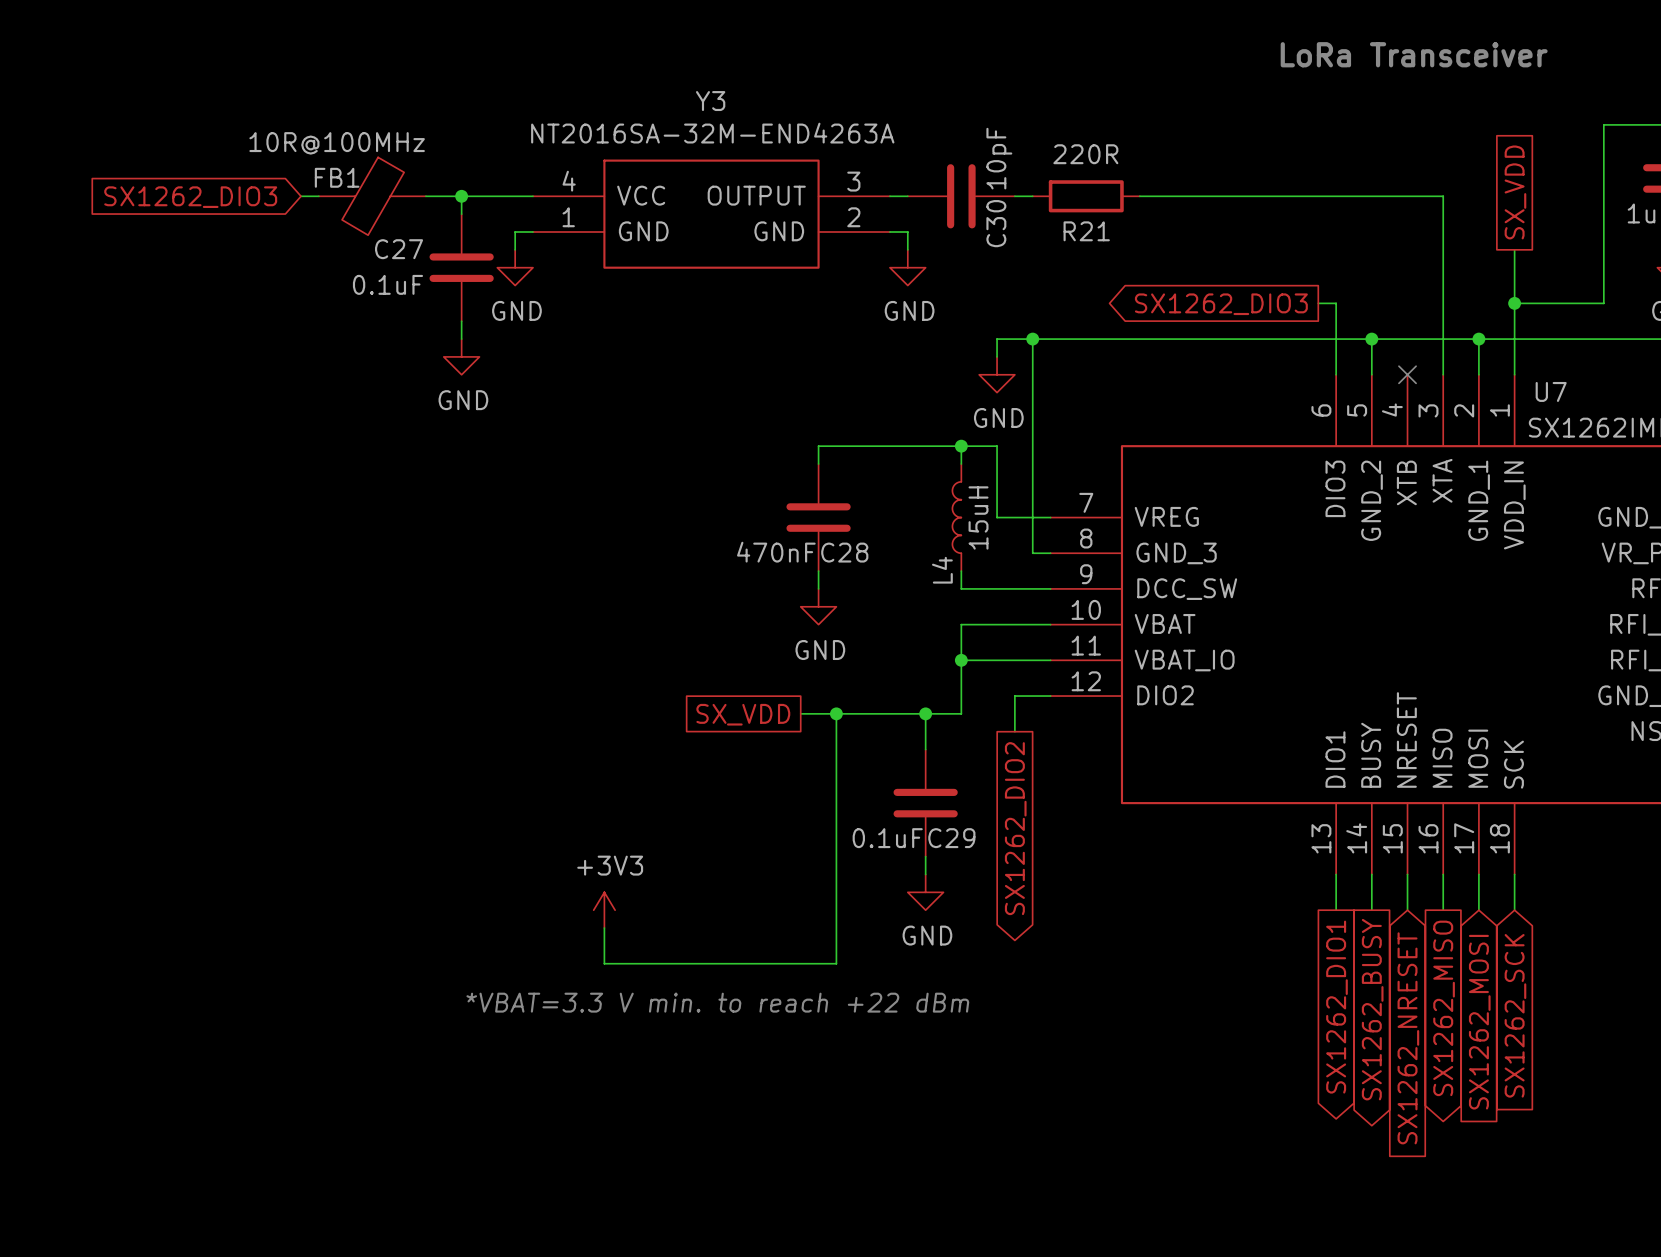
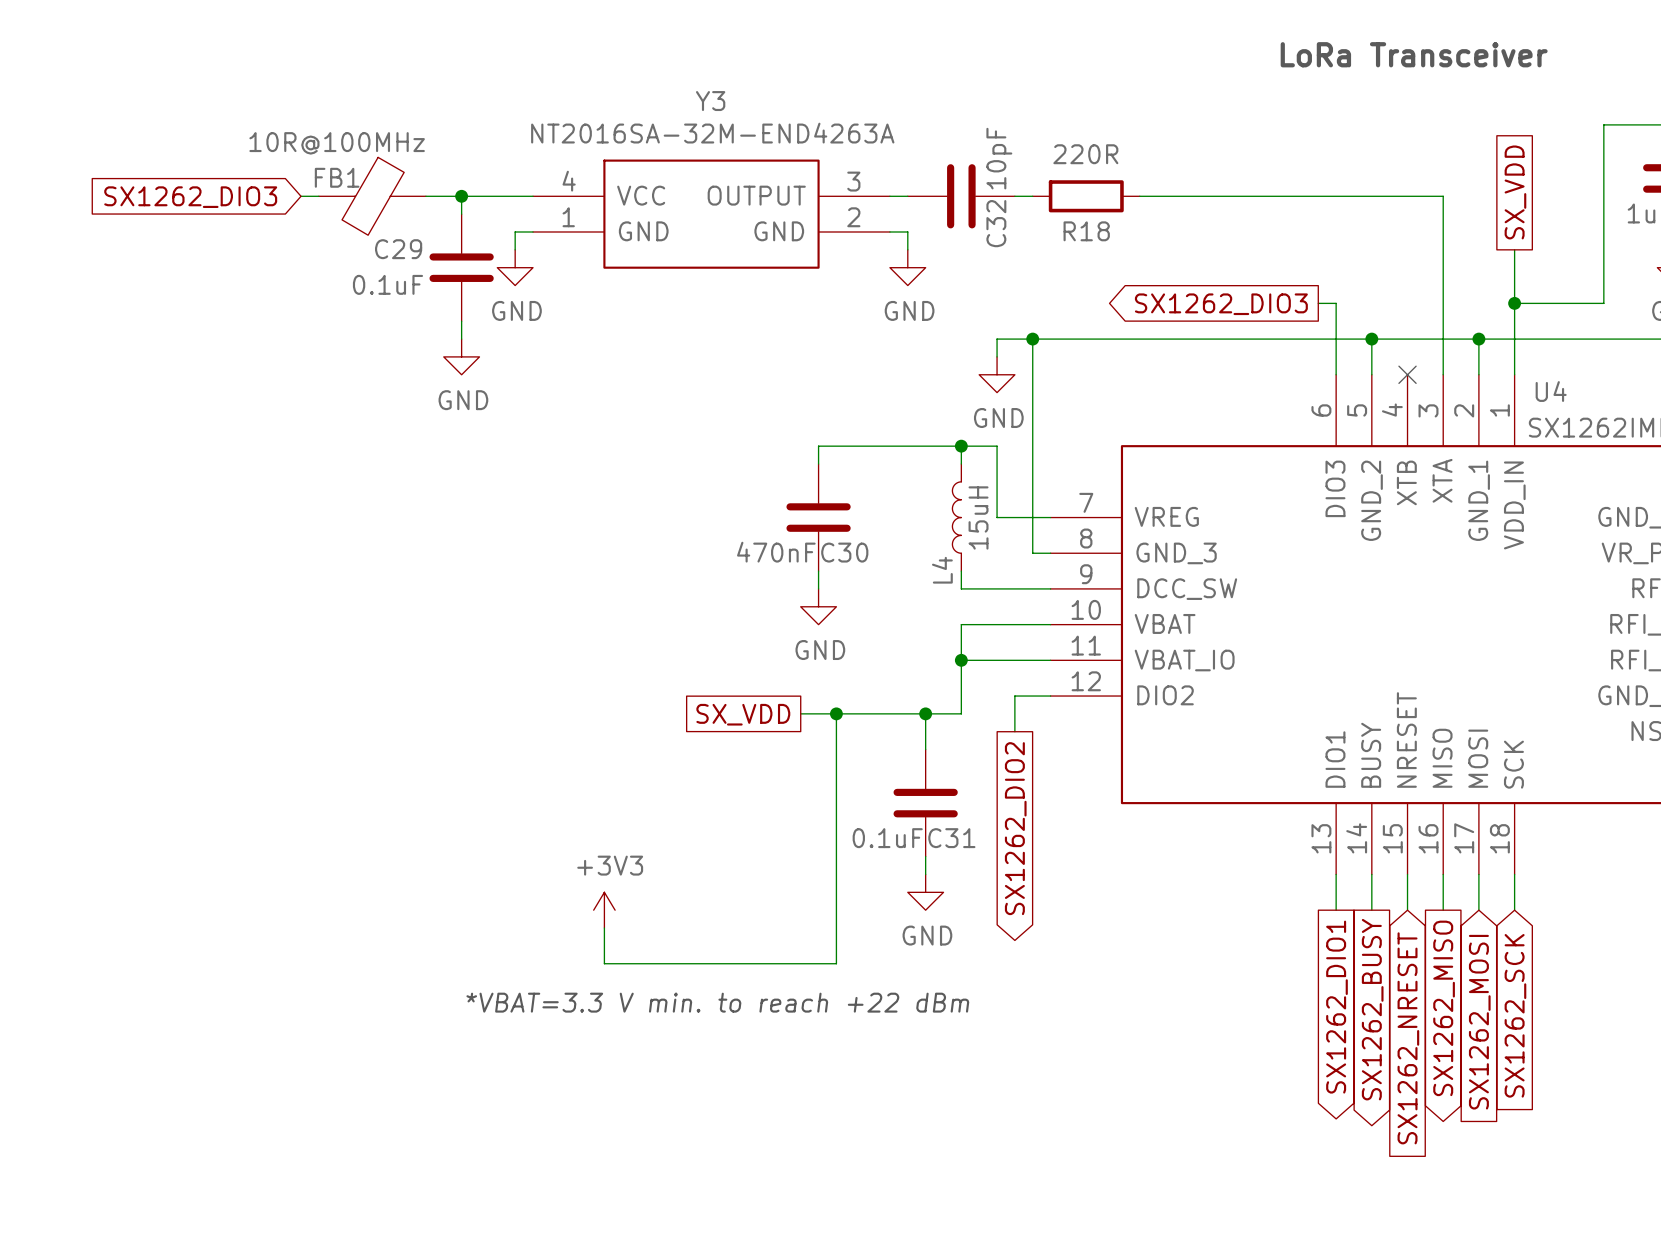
C30 name: C30 (996, 223) -> C32 (996, 223)
R21 name: R21 (1086, 231) -> R18 (1086, 231)
C27 name: C27 (399, 249) -> C29 (398, 249)
U7 name: U7 (1551, 391) -> U4 (1551, 391)
C28 name: C28 (844, 552) -> C30 (844, 552)
C29 name: C29 (951, 838) -> C31 (951, 838)

